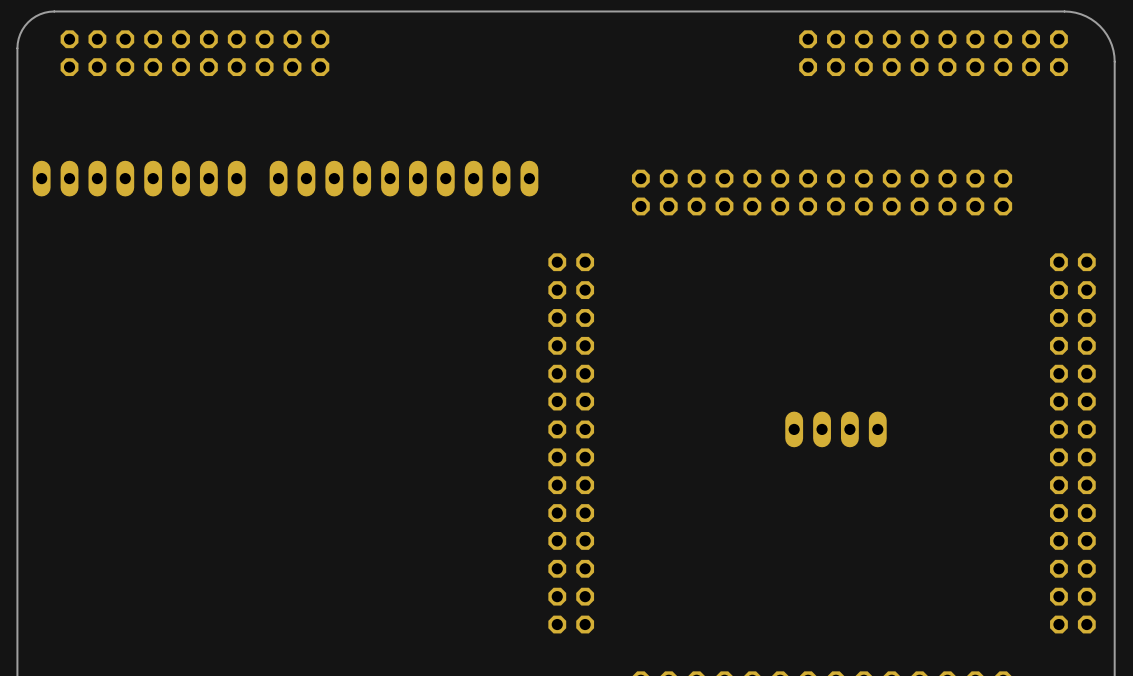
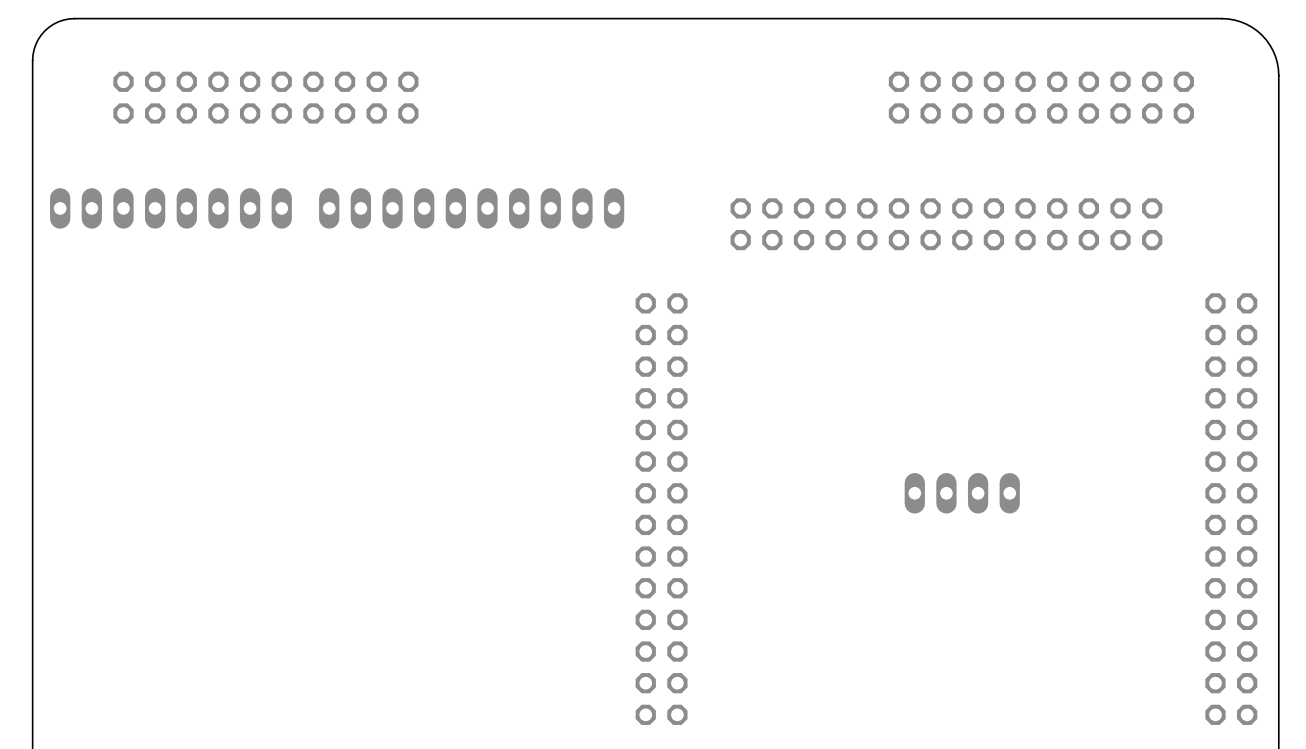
part position: (194, 53) -> (265, 97)
part position: (933, 53) -> (1041, 97)

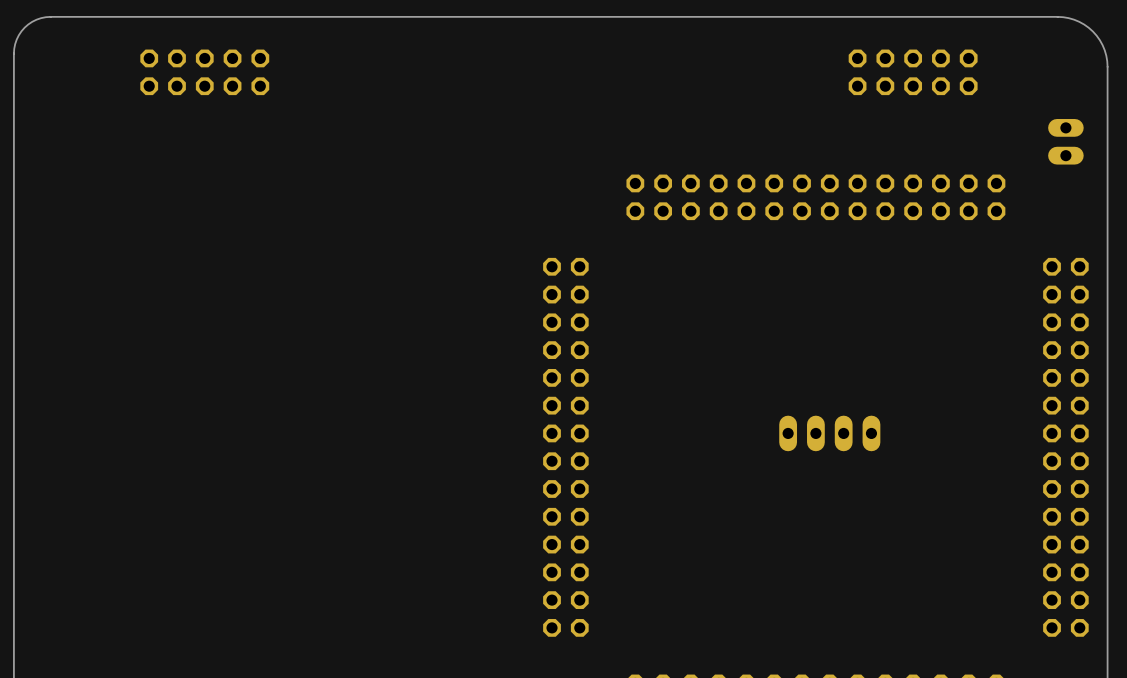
part: none -> (204, 72)
part: none -> (913, 72)
part: (265, 97) -> none
part: (1041, 97) -> none
part: none -> (1065, 141)
part: (170, 208) -> none
part: (471, 208) -> none

